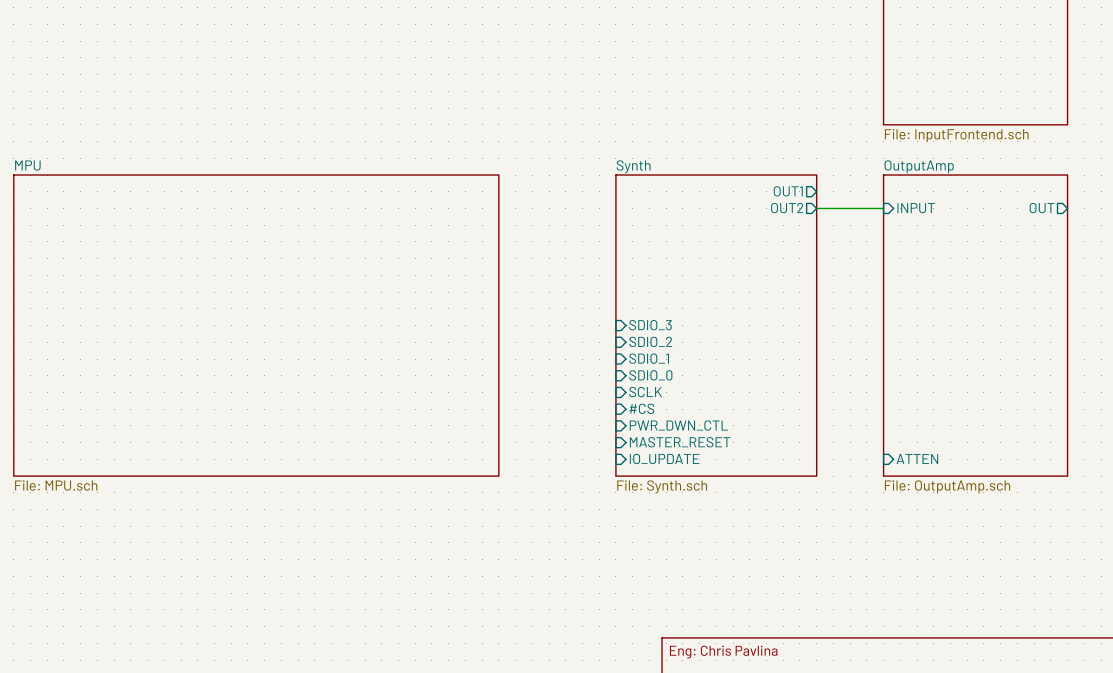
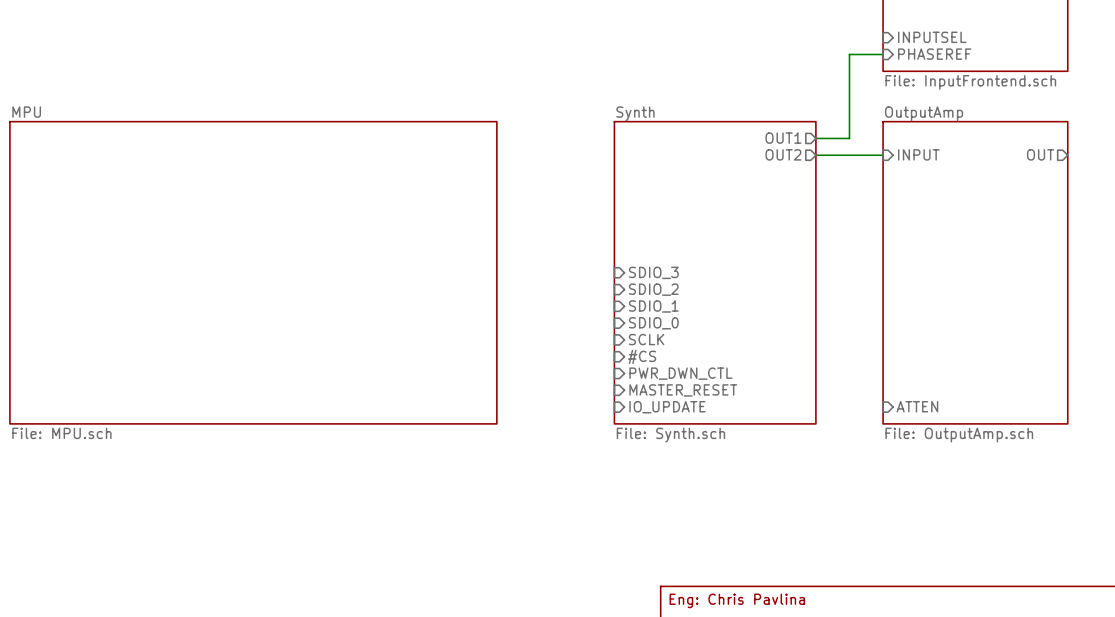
sheet pin: none -> INPUTSEL (932, 37)
sheet pin: none -> PHASEREF (934, 54)
wire: none -> (883, 54) (849, 54) (849, 138) (815, 138)

